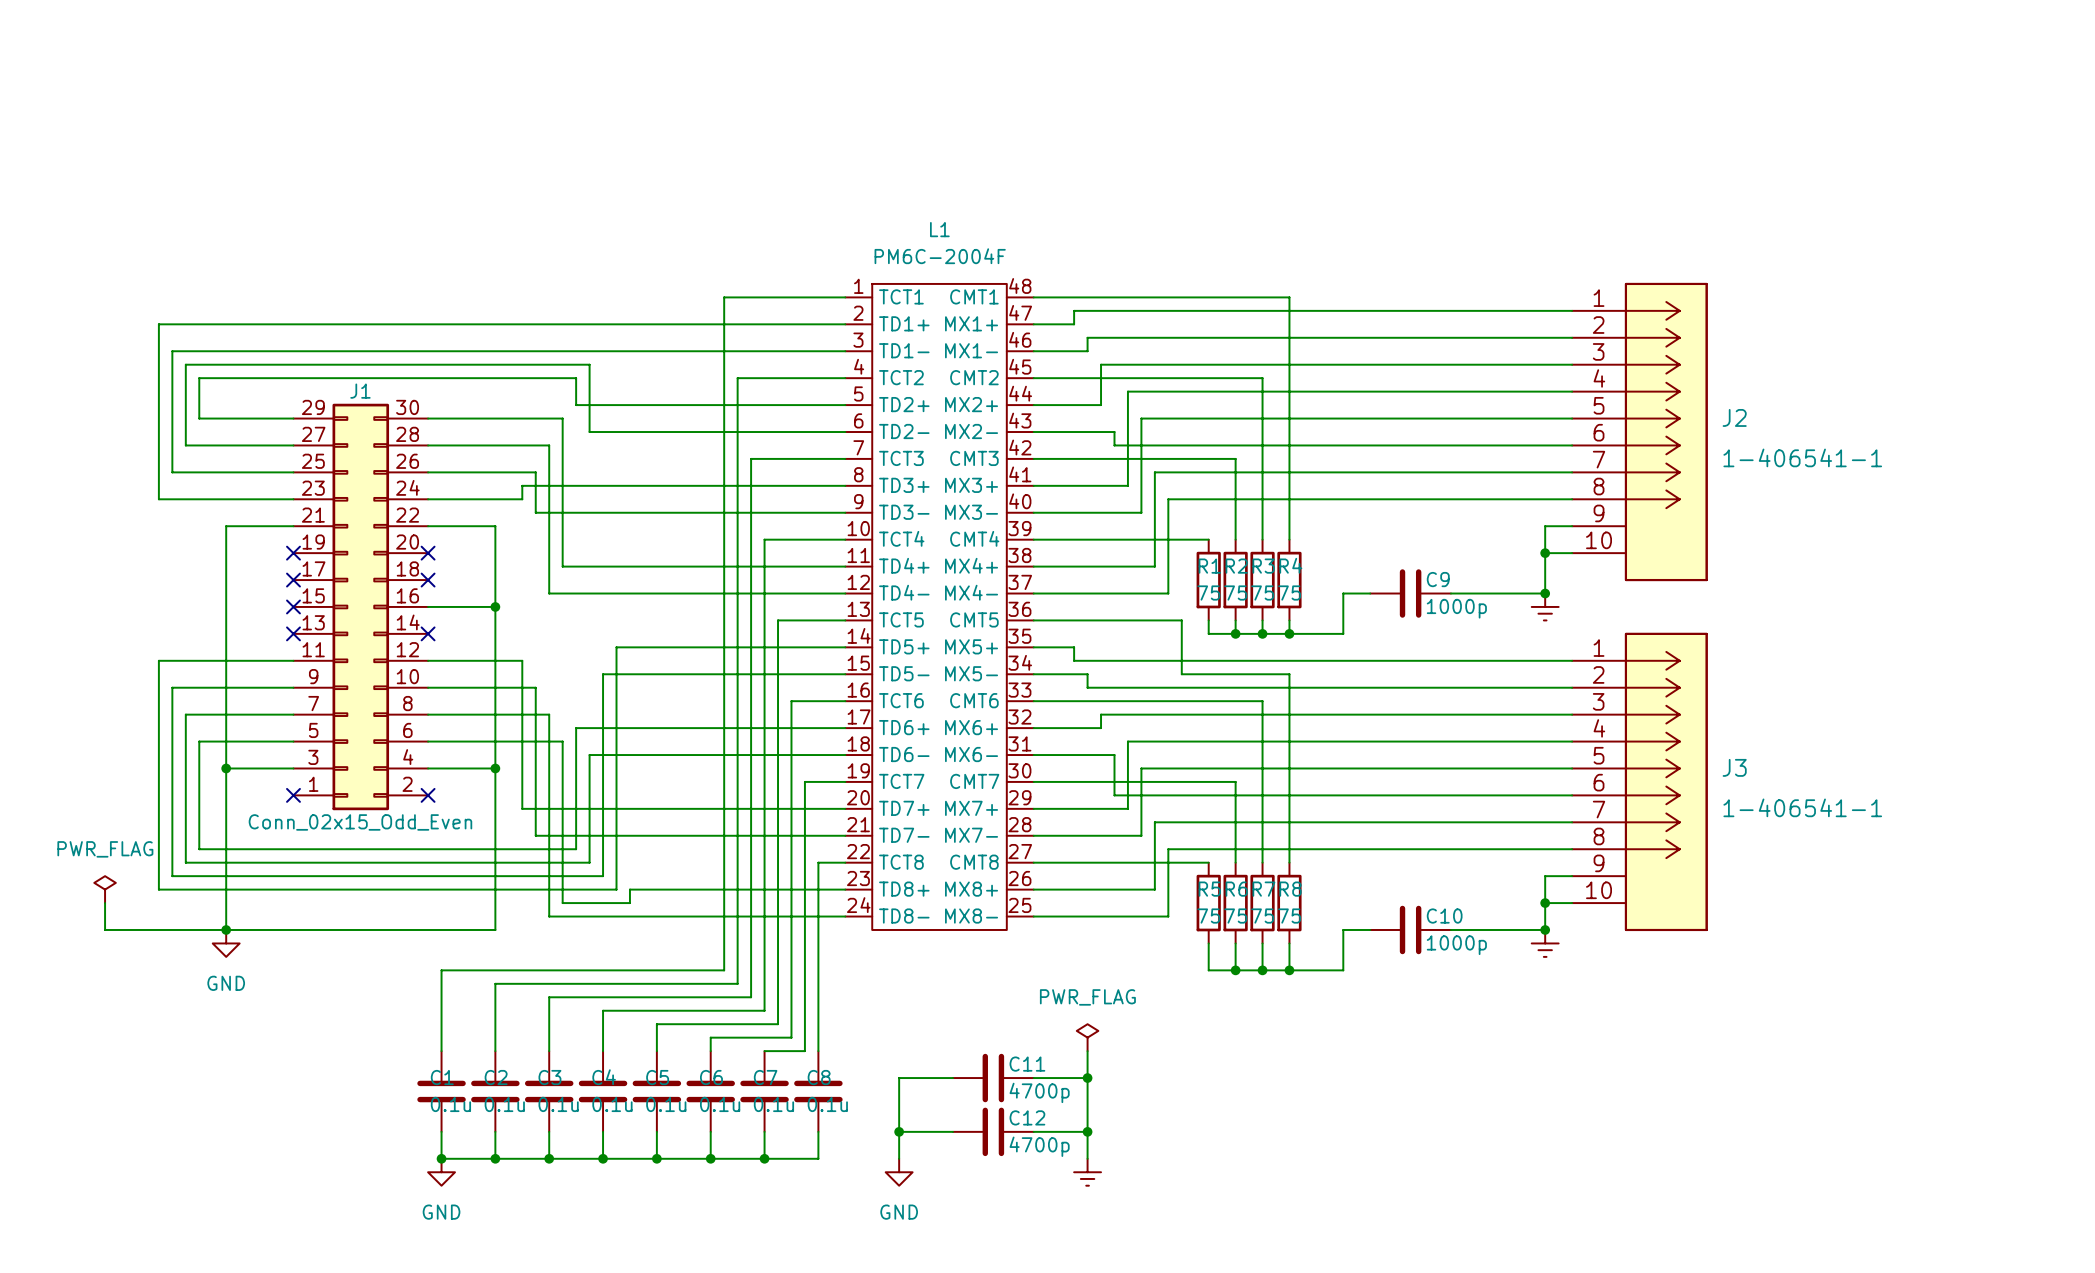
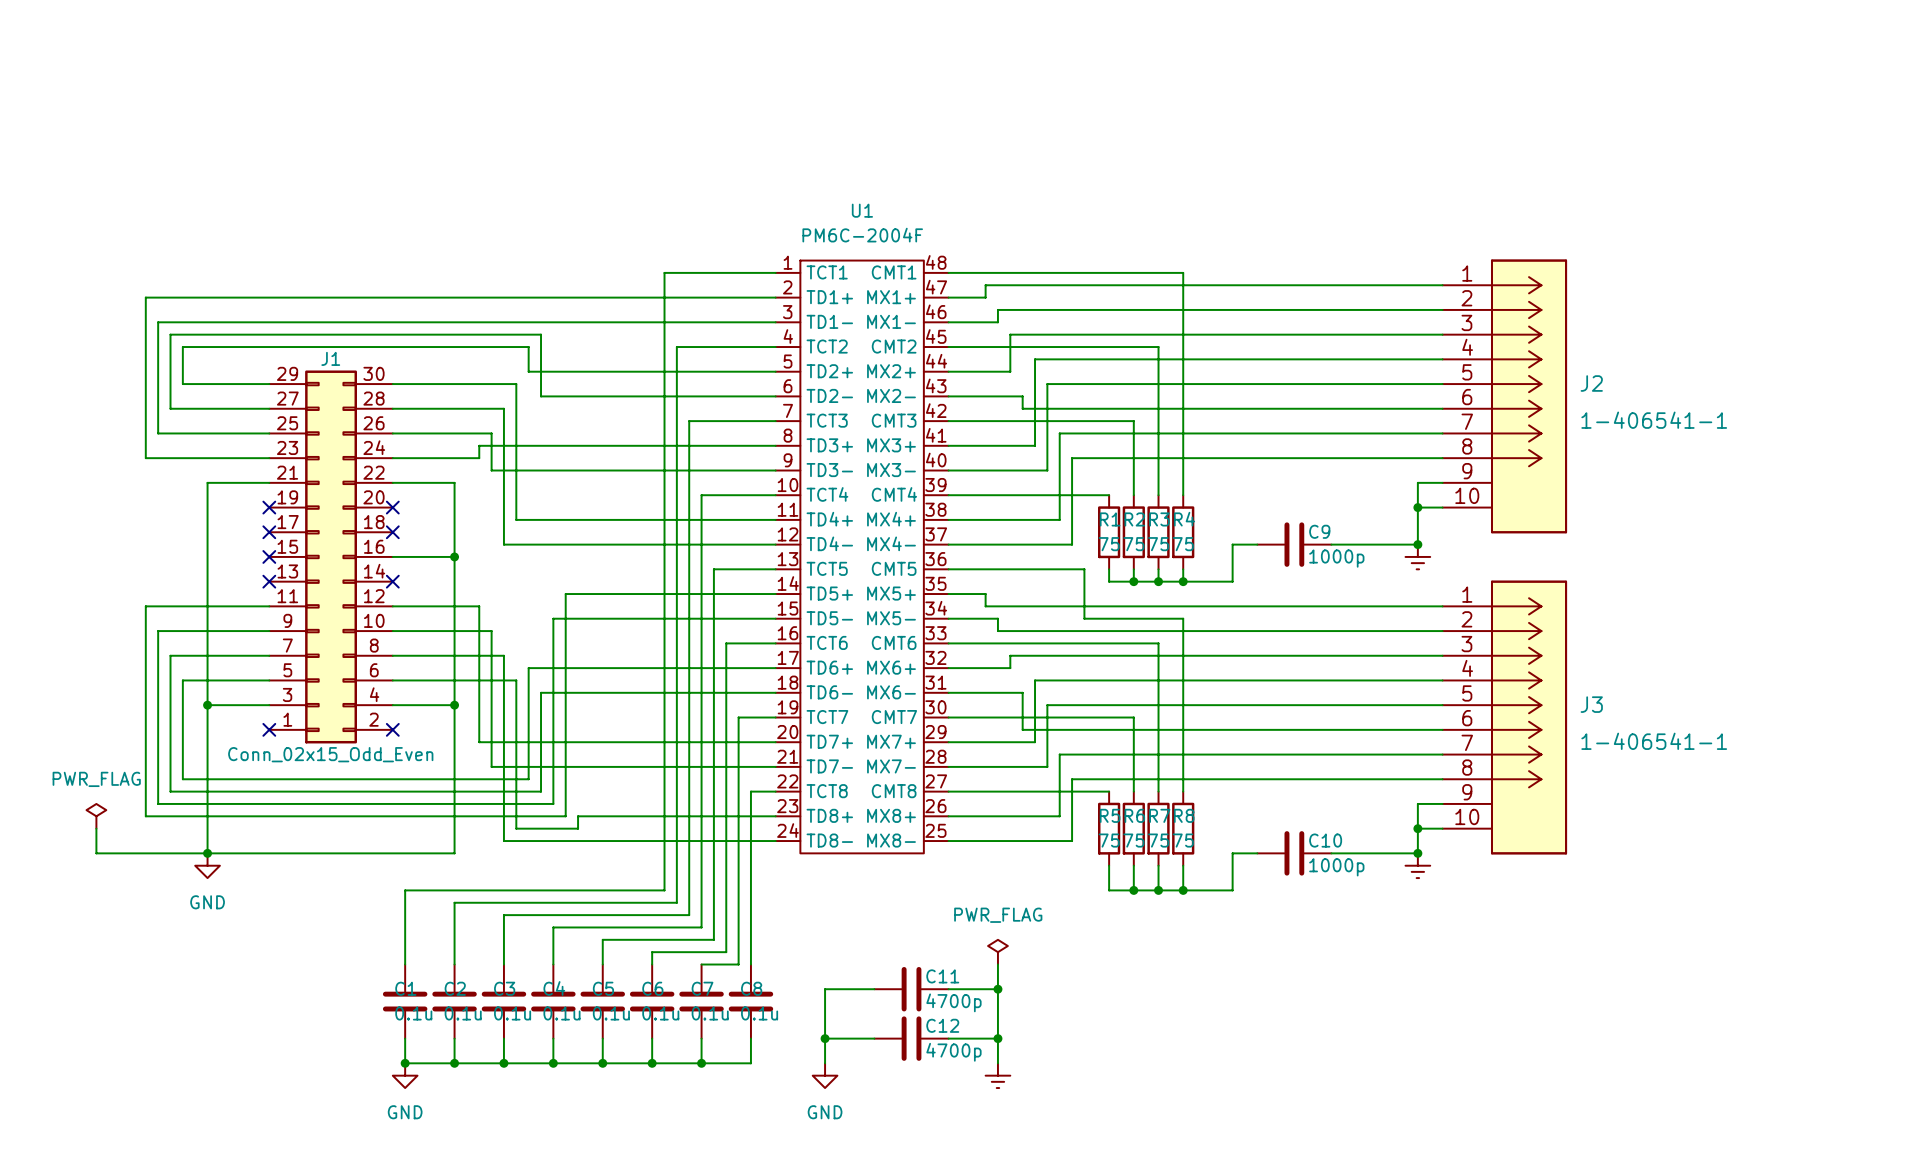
L1 name: L1 (939, 229) -> U1 (862, 210)

